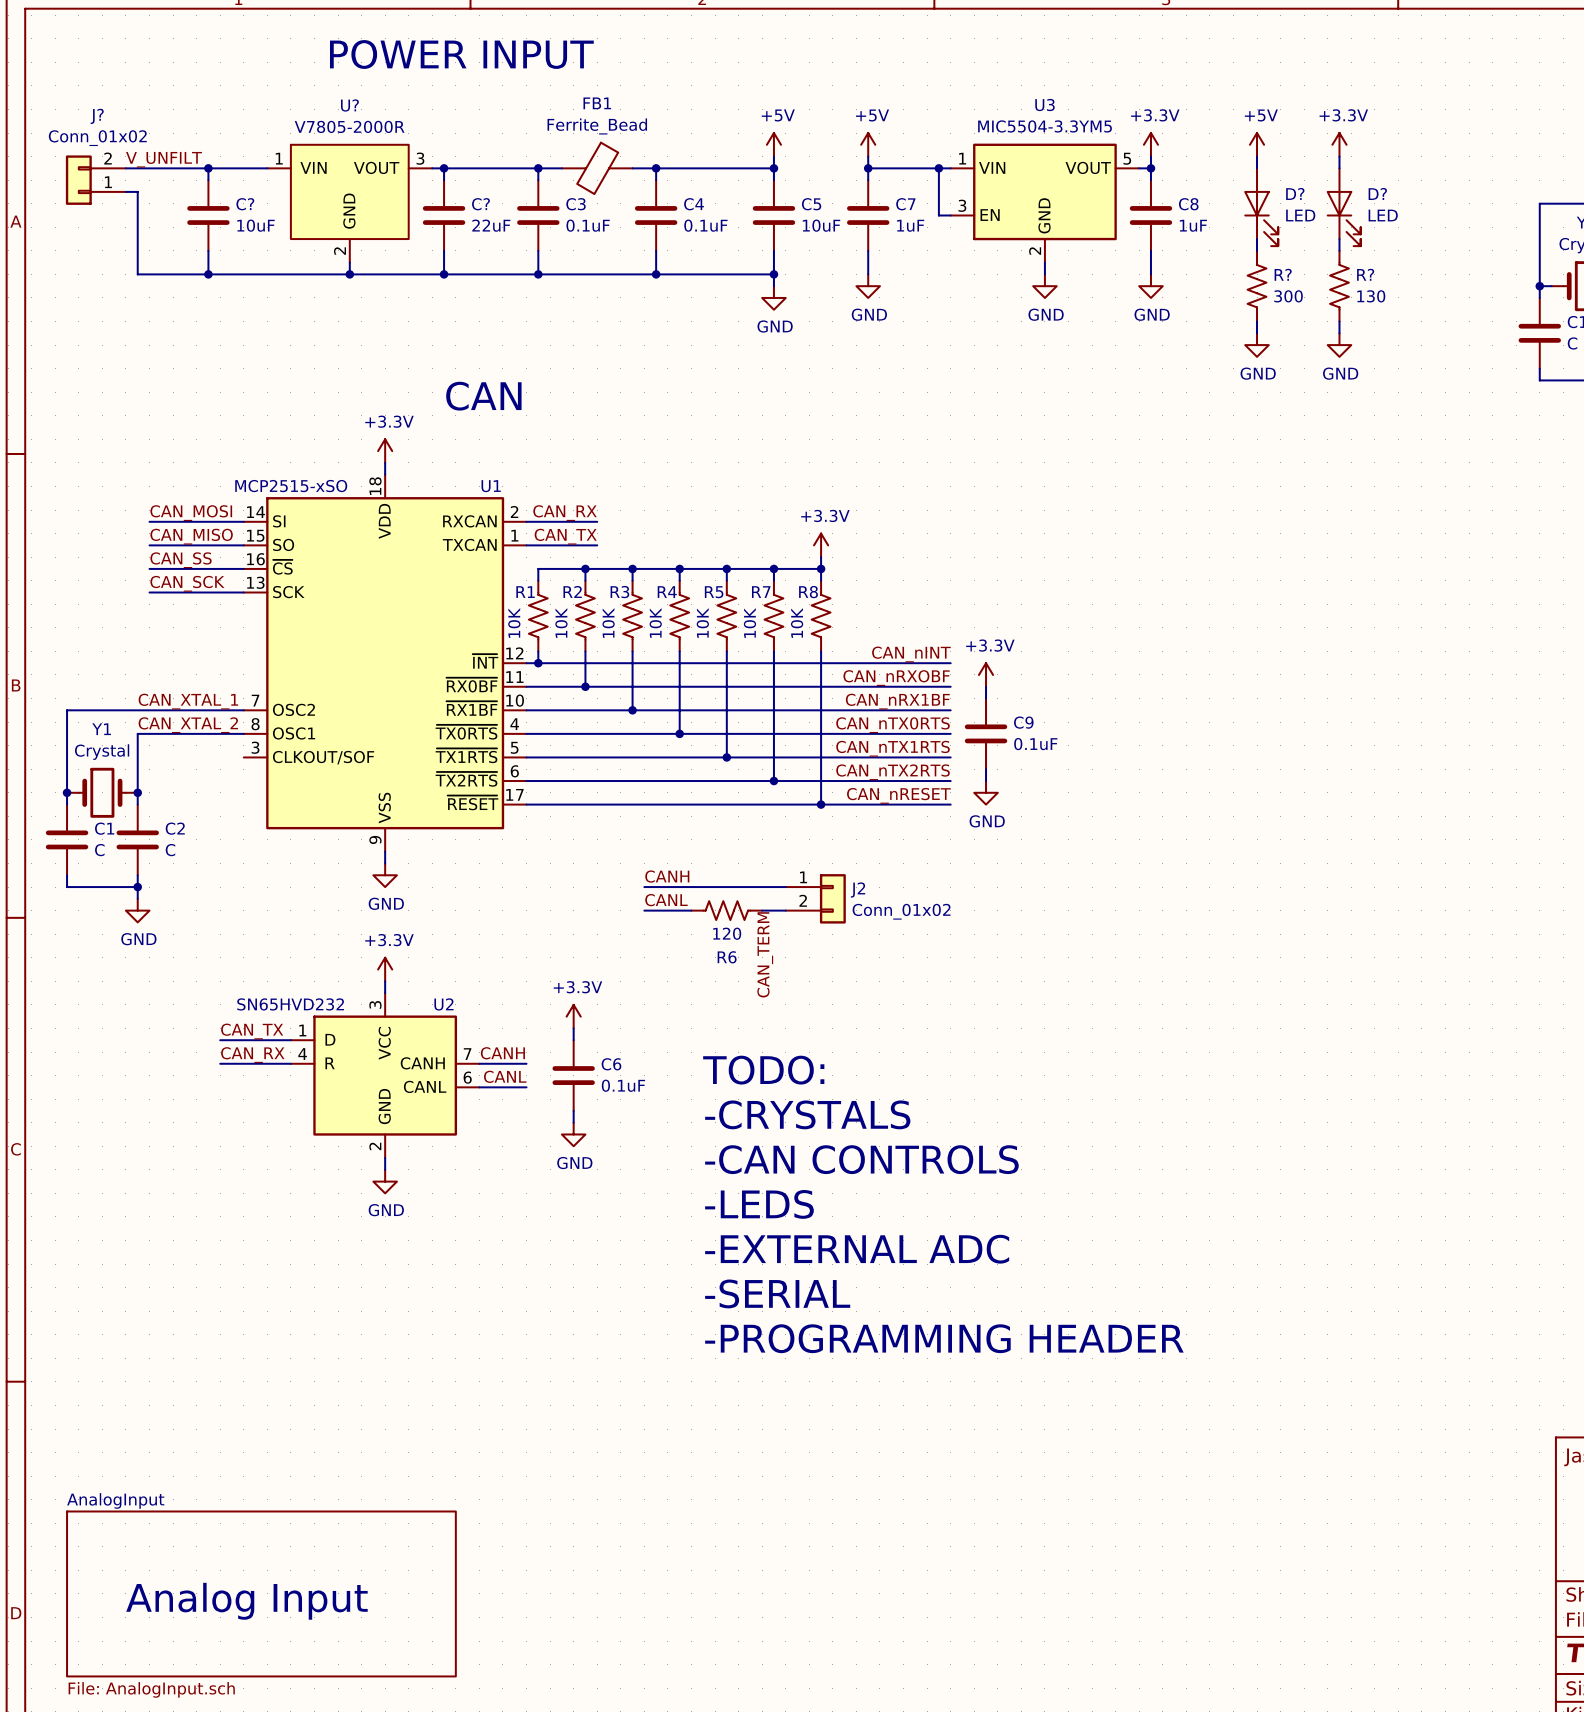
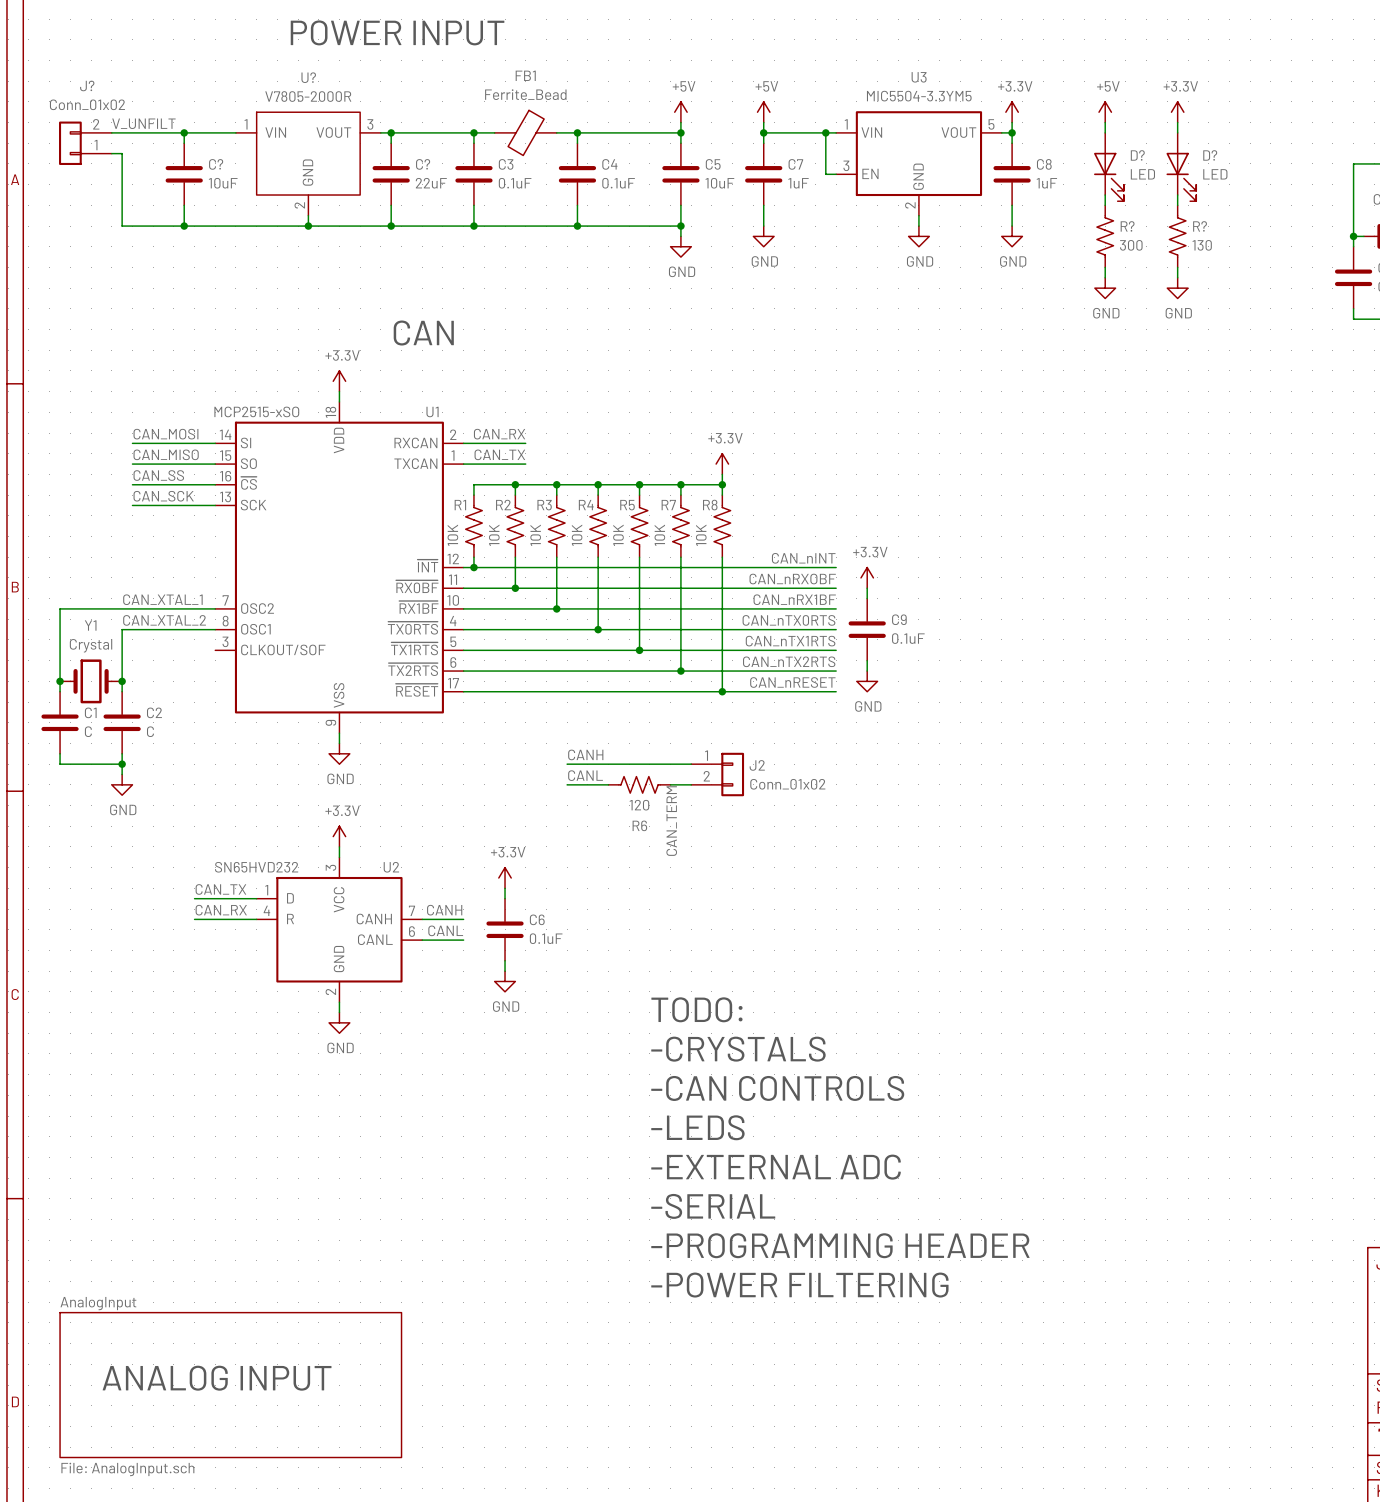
text position: TODO: (763, 1070) -> TODO: (696, 1009)
text position: -CRYSTALS (807, 1114) -> -CRYSTALS (738, 1049)
text position: -CAN CONTROLS (861, 1159) -> -CAN CONTROLS (777, 1088)
text position: -LEDS (759, 1204) -> -LEDS (697, 1127)
text position: -EXTERNAL ADC (857, 1249) -> -EXTERNAL ADC (776, 1167)
text position: -SERIAL (777, 1293) -> -SERIAL (713, 1206)
text position: -PROGRAMMING HEADER (944, 1338) -> -PROGRAMMING HEADER (840, 1245)
text: none -> -POWER FILTERING (799, 1285)
text: none -> ANALOG INPUT (217, 1378)
text: Analog Input (246, 1601) -> none

